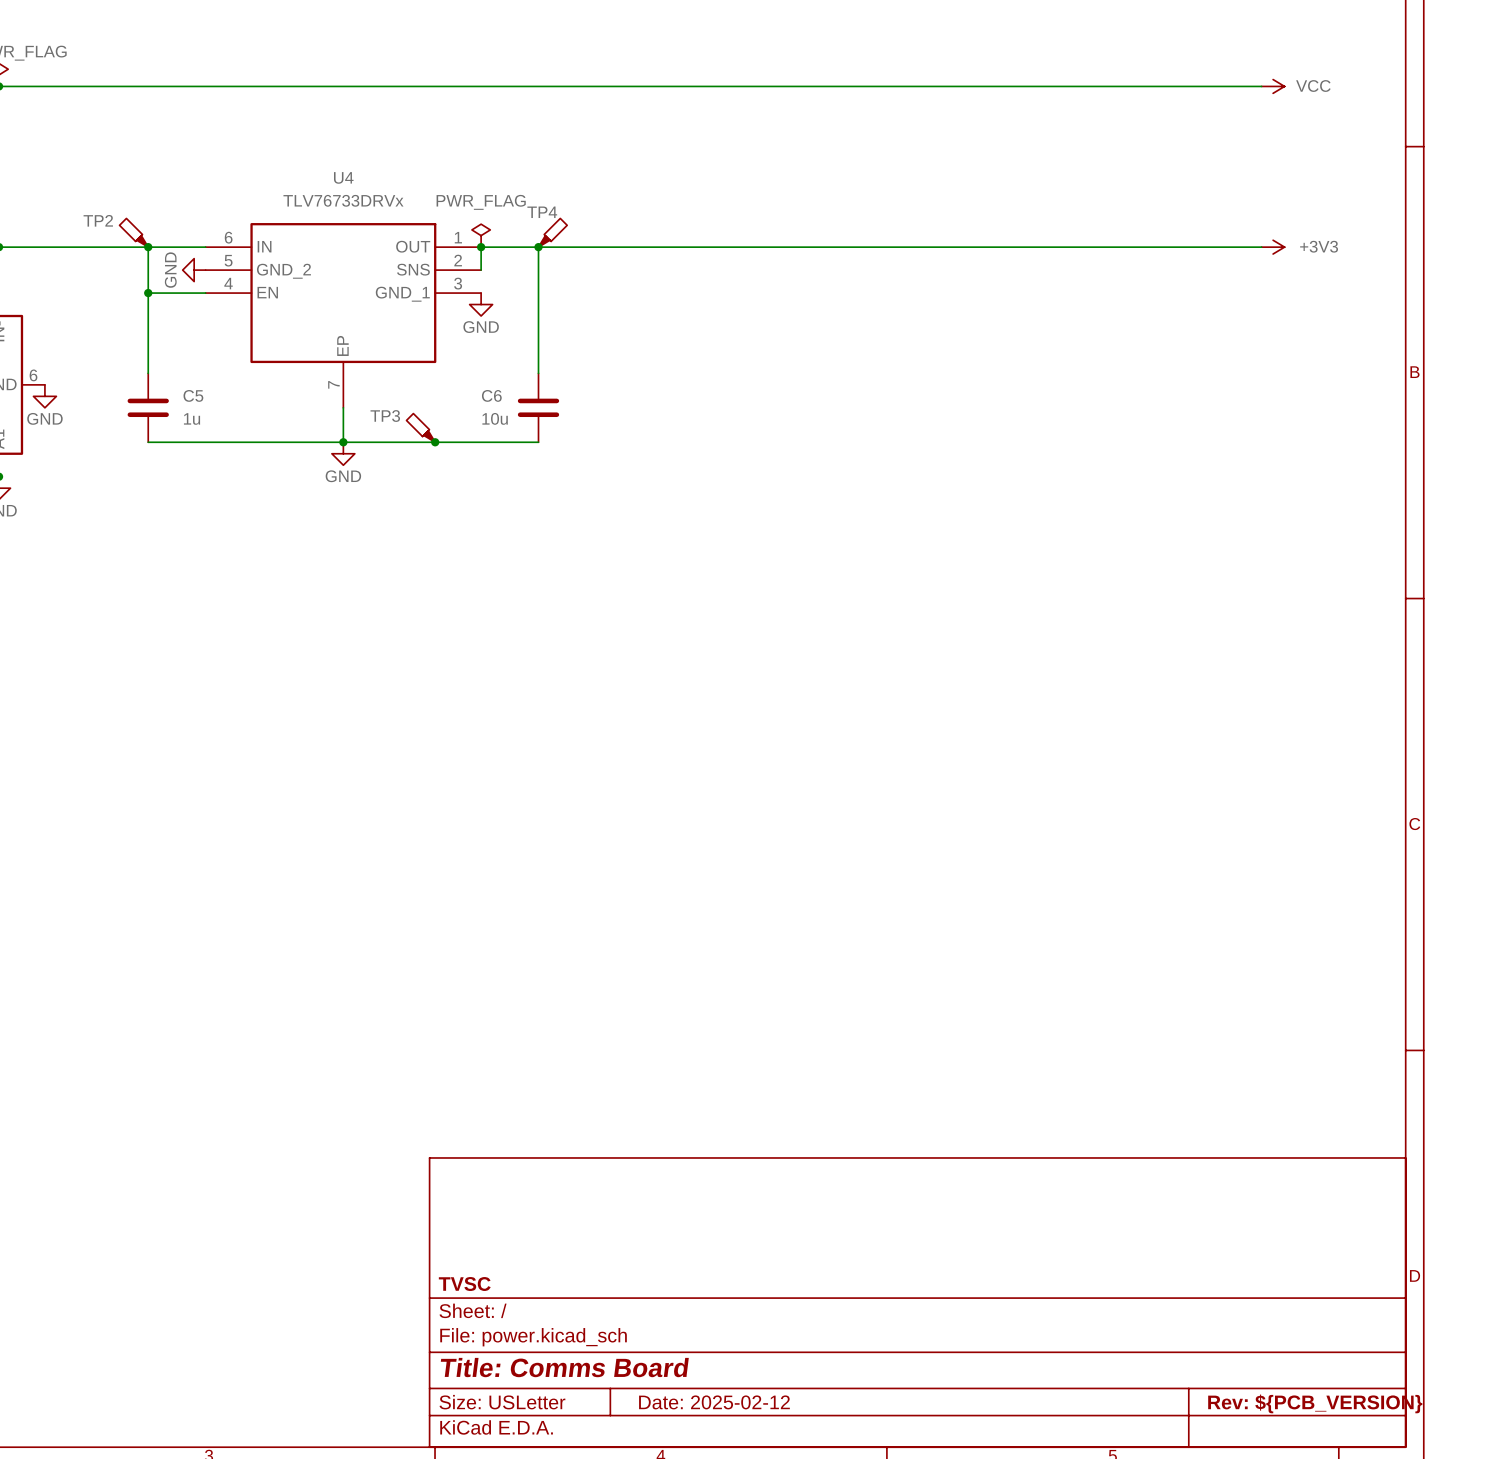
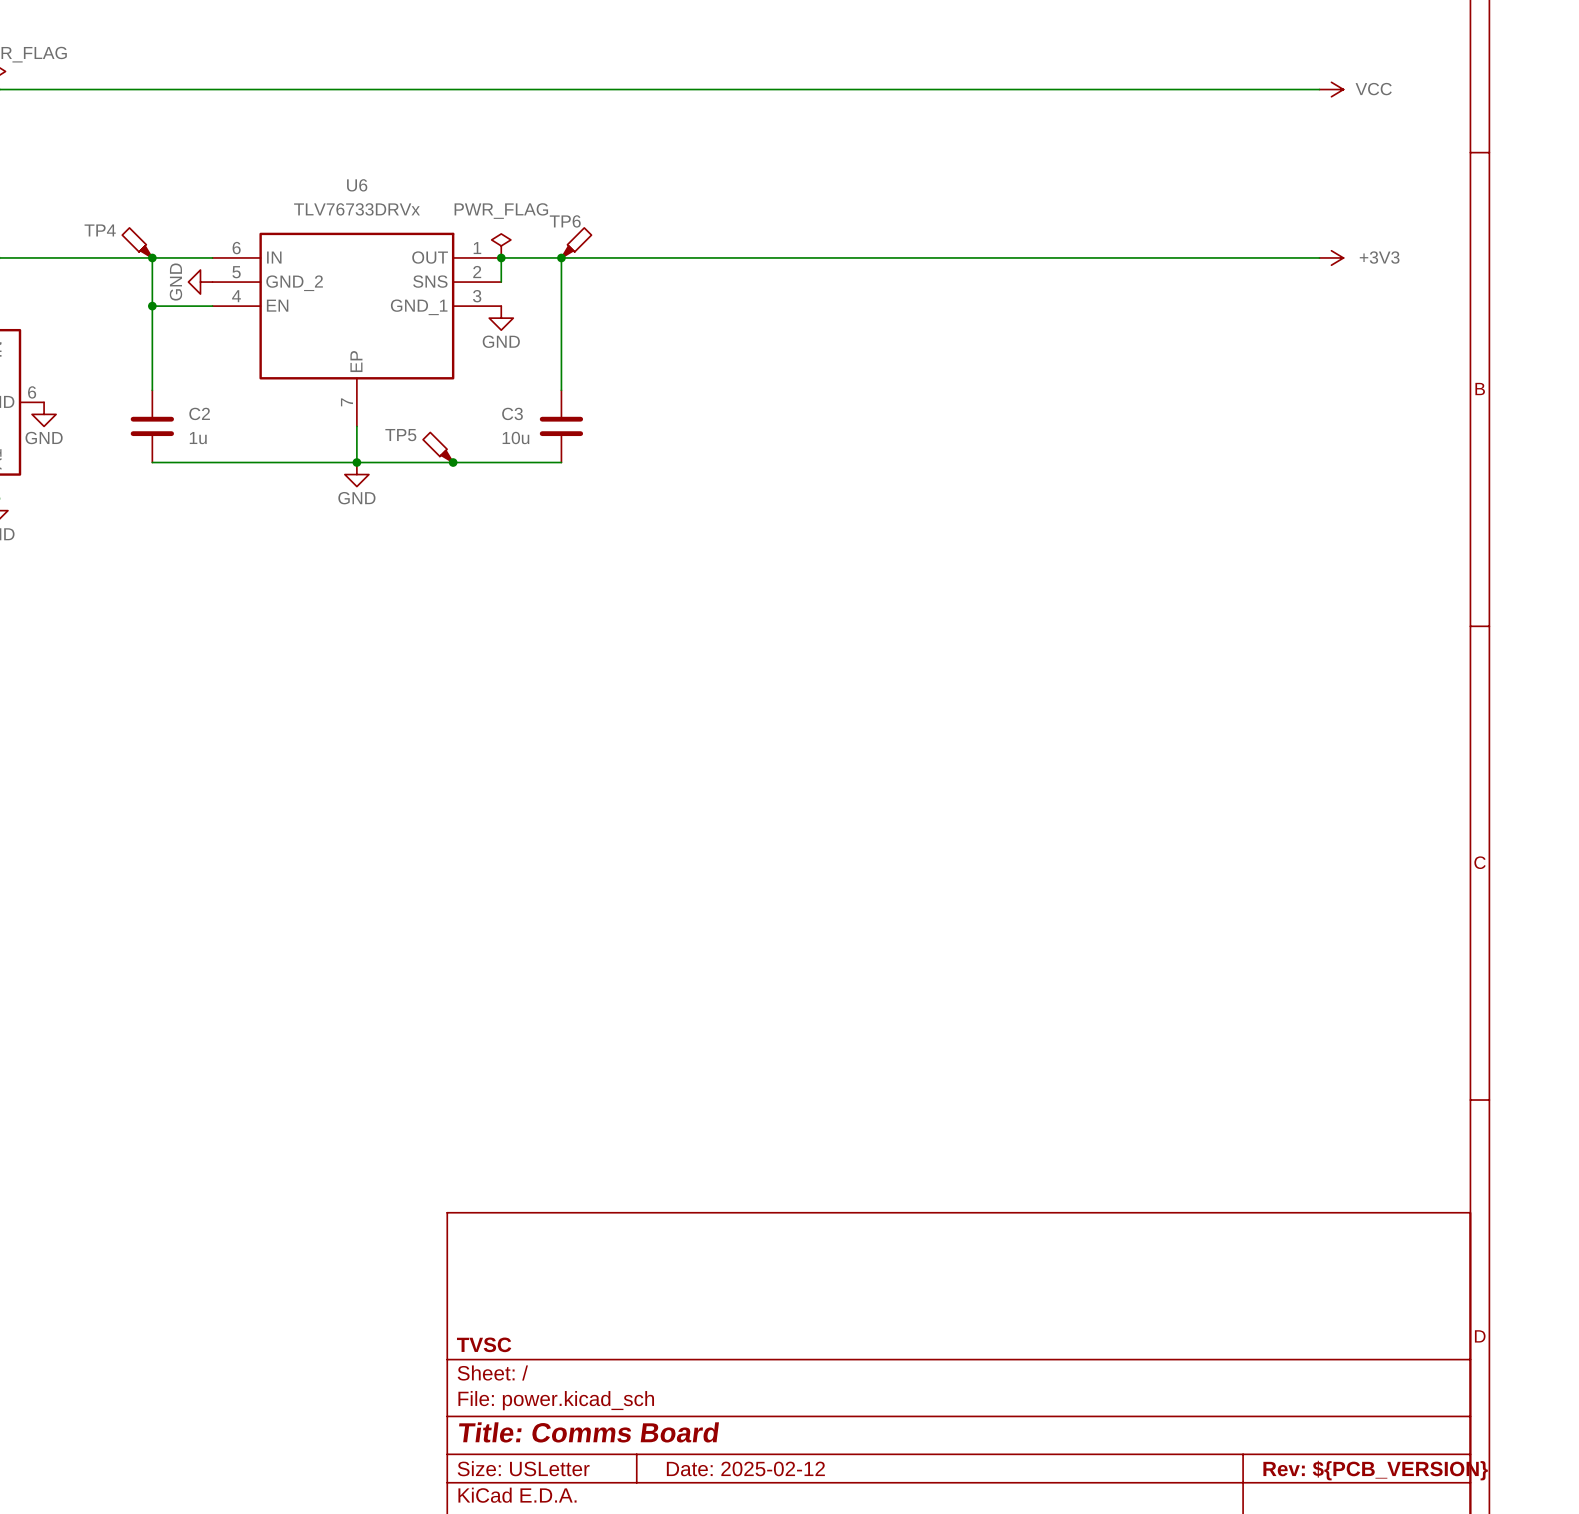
U4 name: U4 (343, 177) -> U6 (357, 185)
TP4 name: TP4 (542, 212) -> TP6 (565, 221)
TP2 name: TP2 (98, 220) -> TP4 (100, 230)
C5 name: C5 (193, 395) -> C2 (199, 413)
C6 name: C6 (491, 395) -> C3 (512, 413)
TP3 name: TP3 (385, 416) -> TP5 (400, 435)

